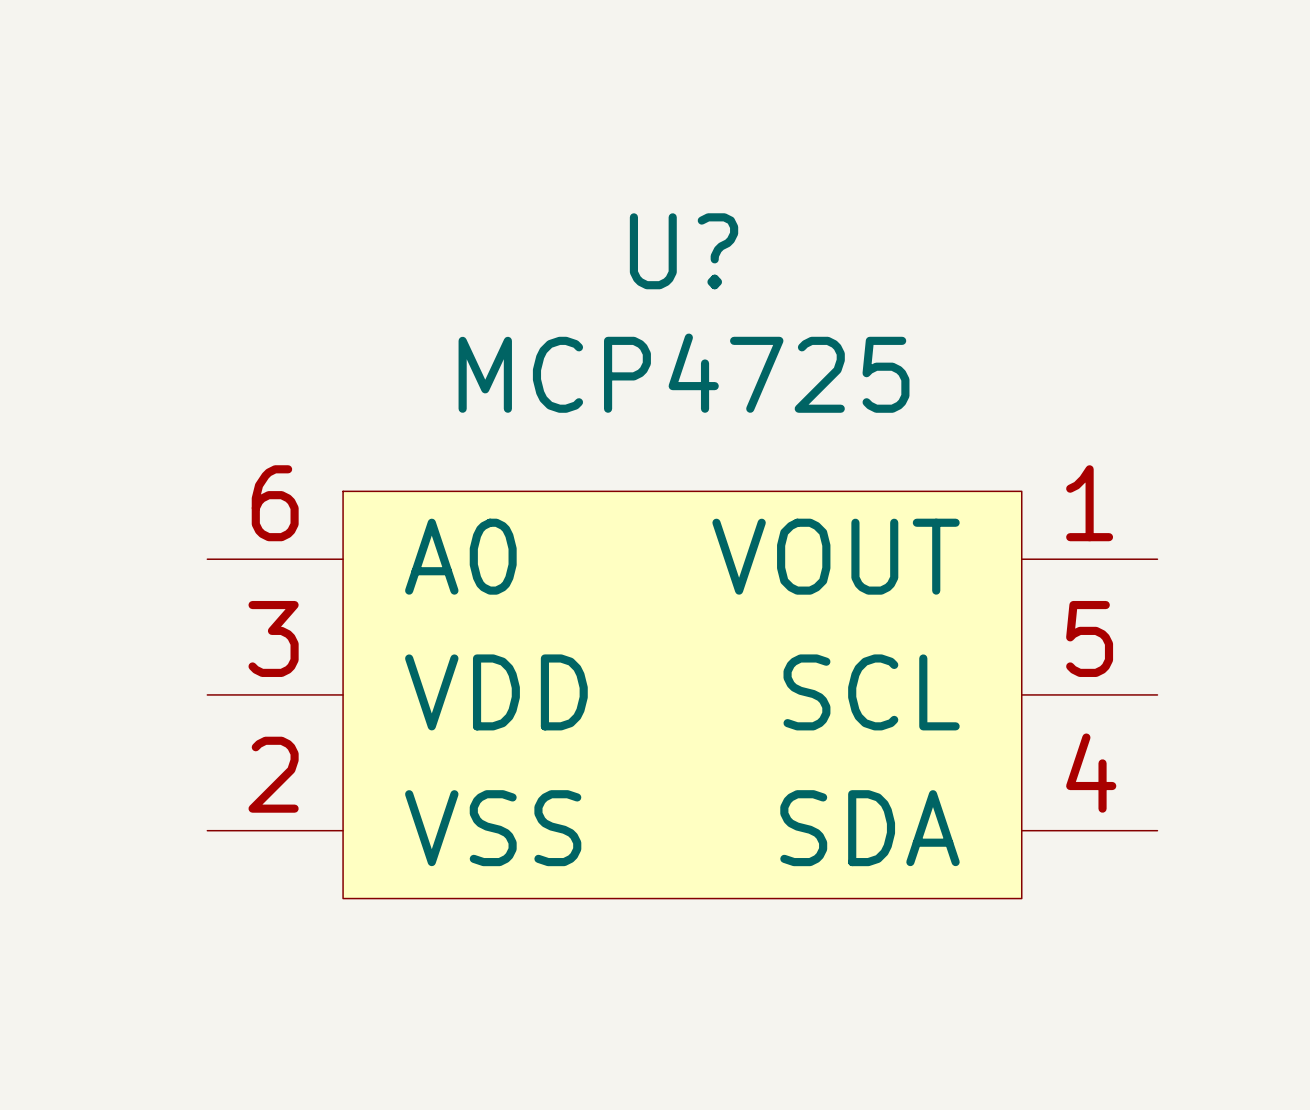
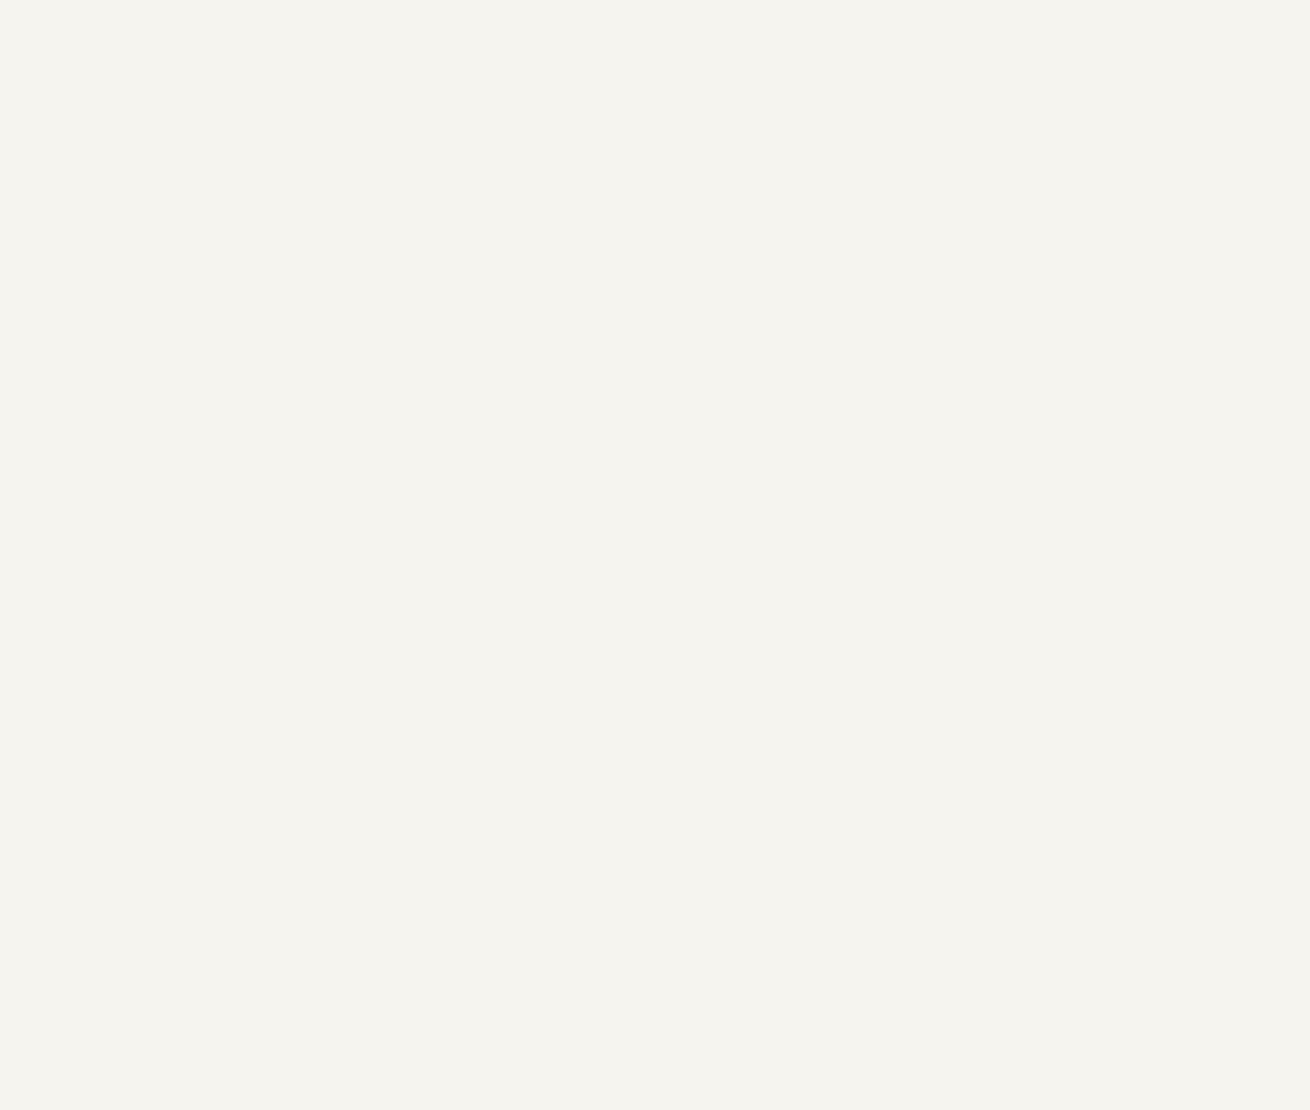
U?: MCP4725 (682, 694) -> none

